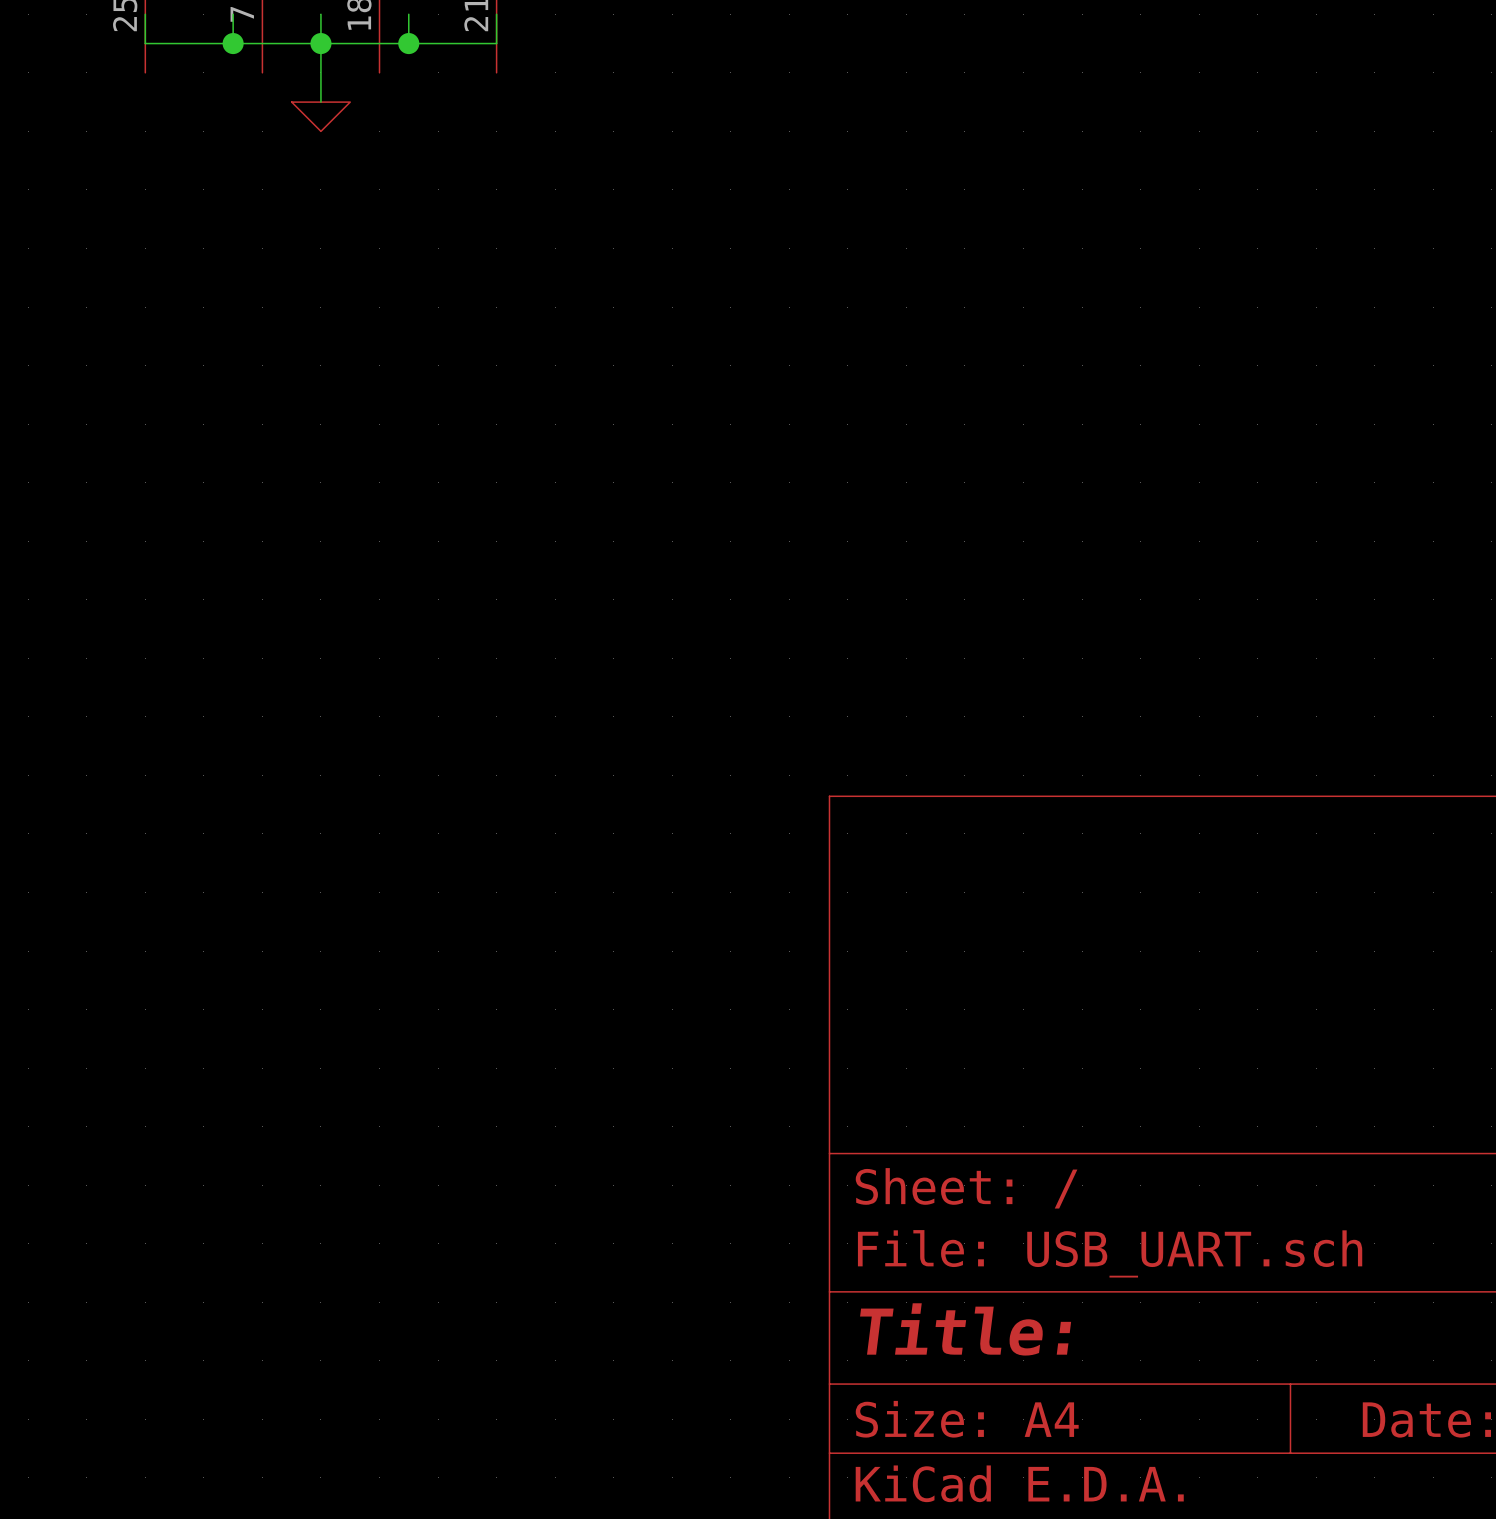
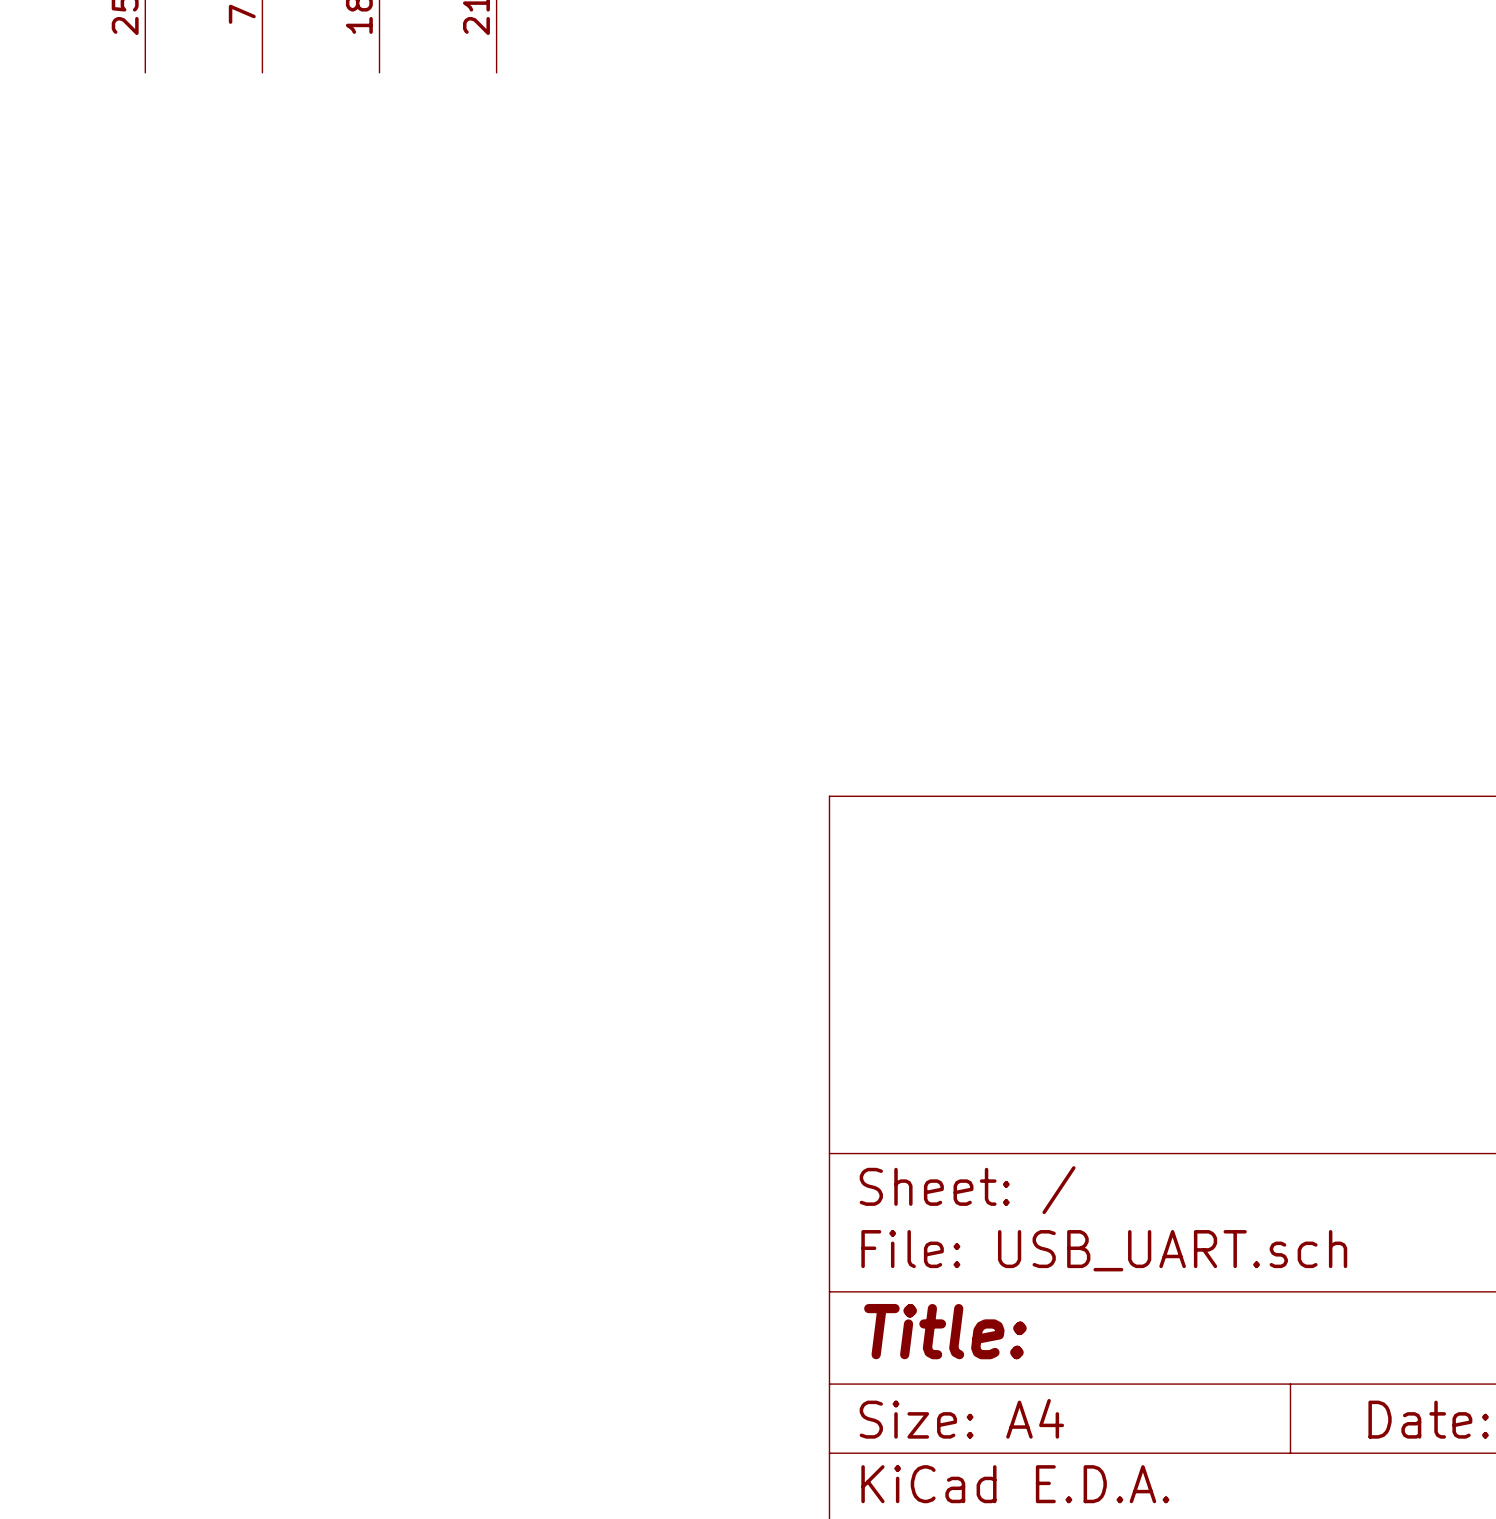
wire: (145, 14) (145, 43) (496, 43) (496, 14) -> none
wire: (233, 14) (233, 43) -> none
wire: (320, 14) (320, 102) -> none
wire: (408, 14) (408, 43) -> none
junction: (233, 43) -> none
junction: (320, 43) -> none
junction: (408, 43) -> none
power symbol: (320, 116) -> none

